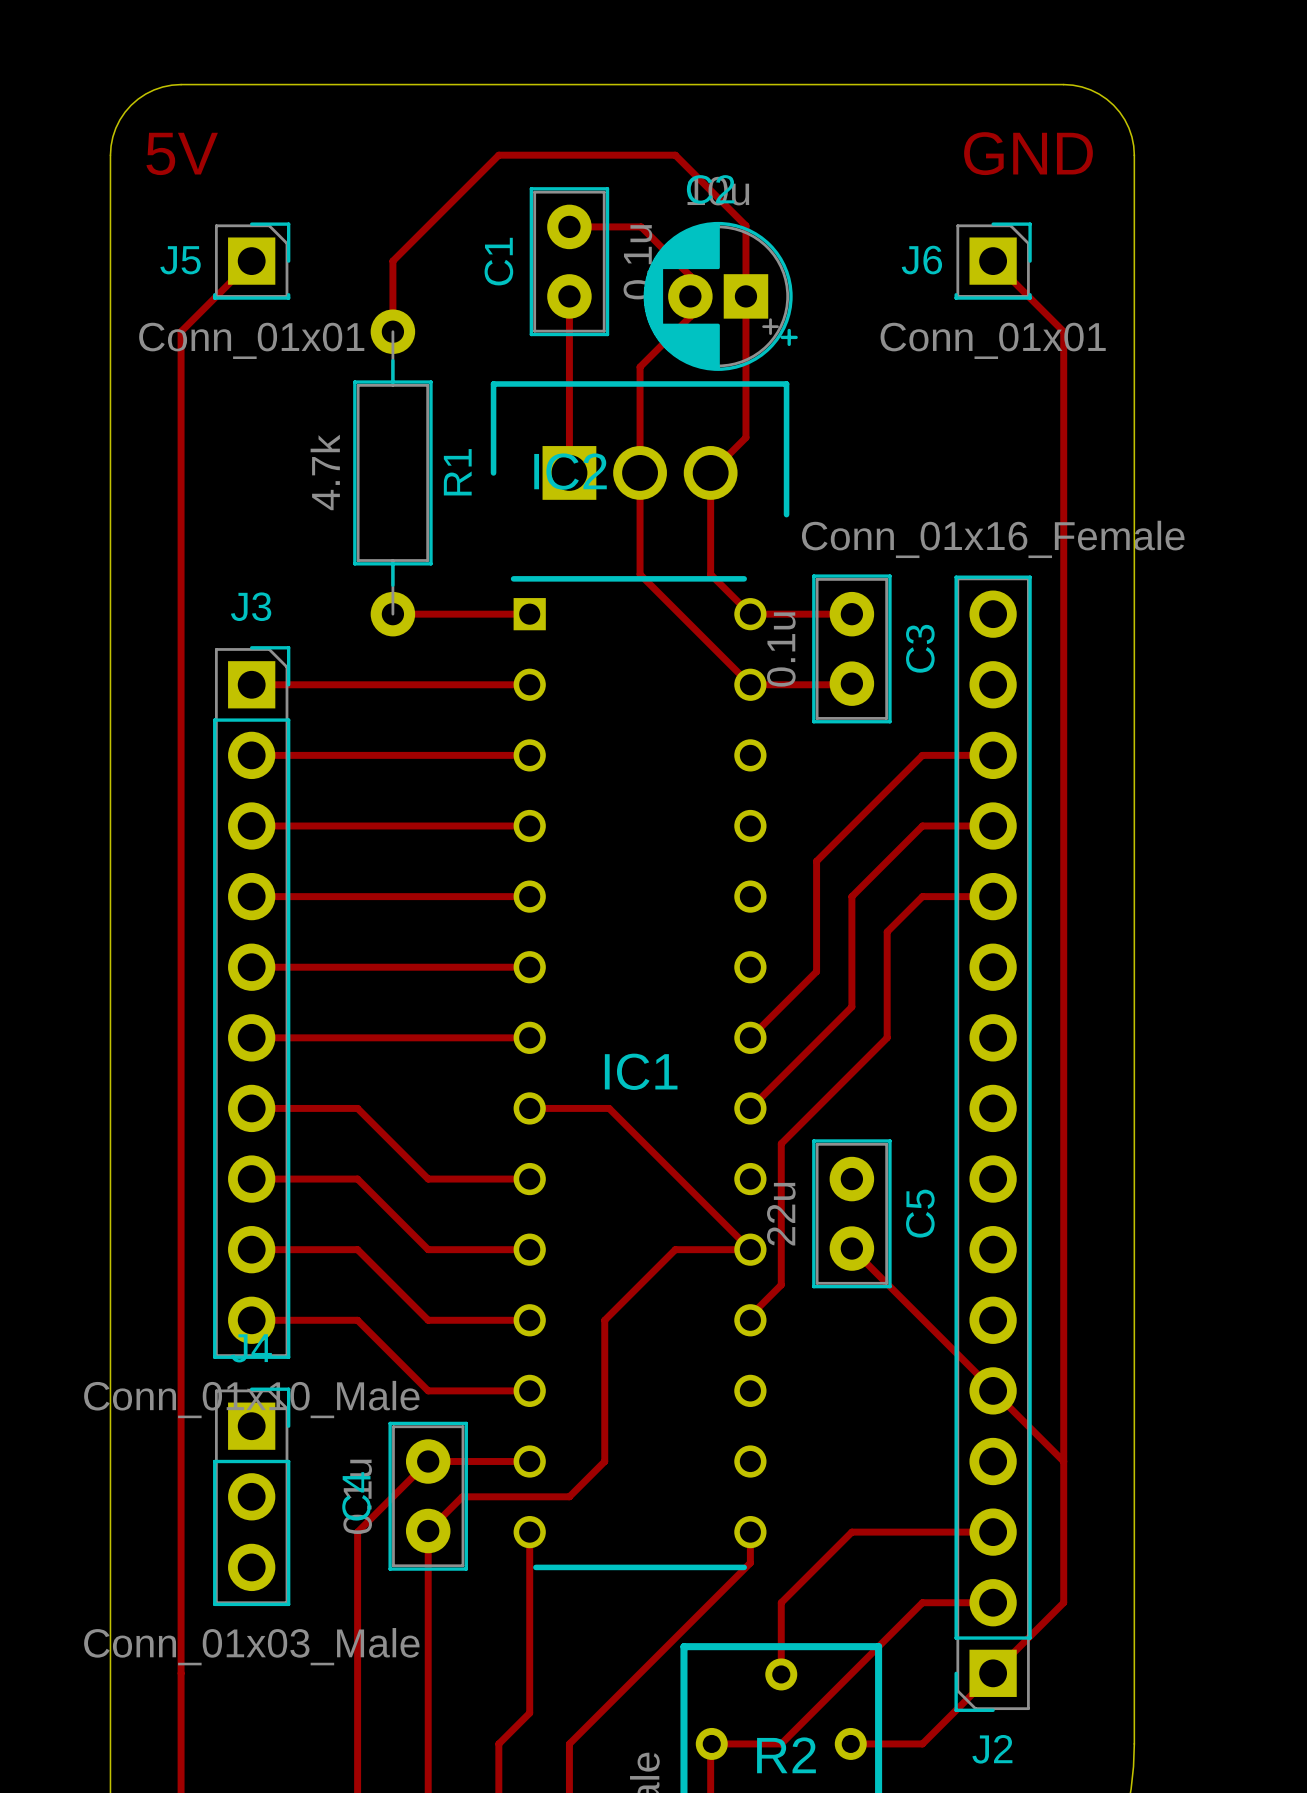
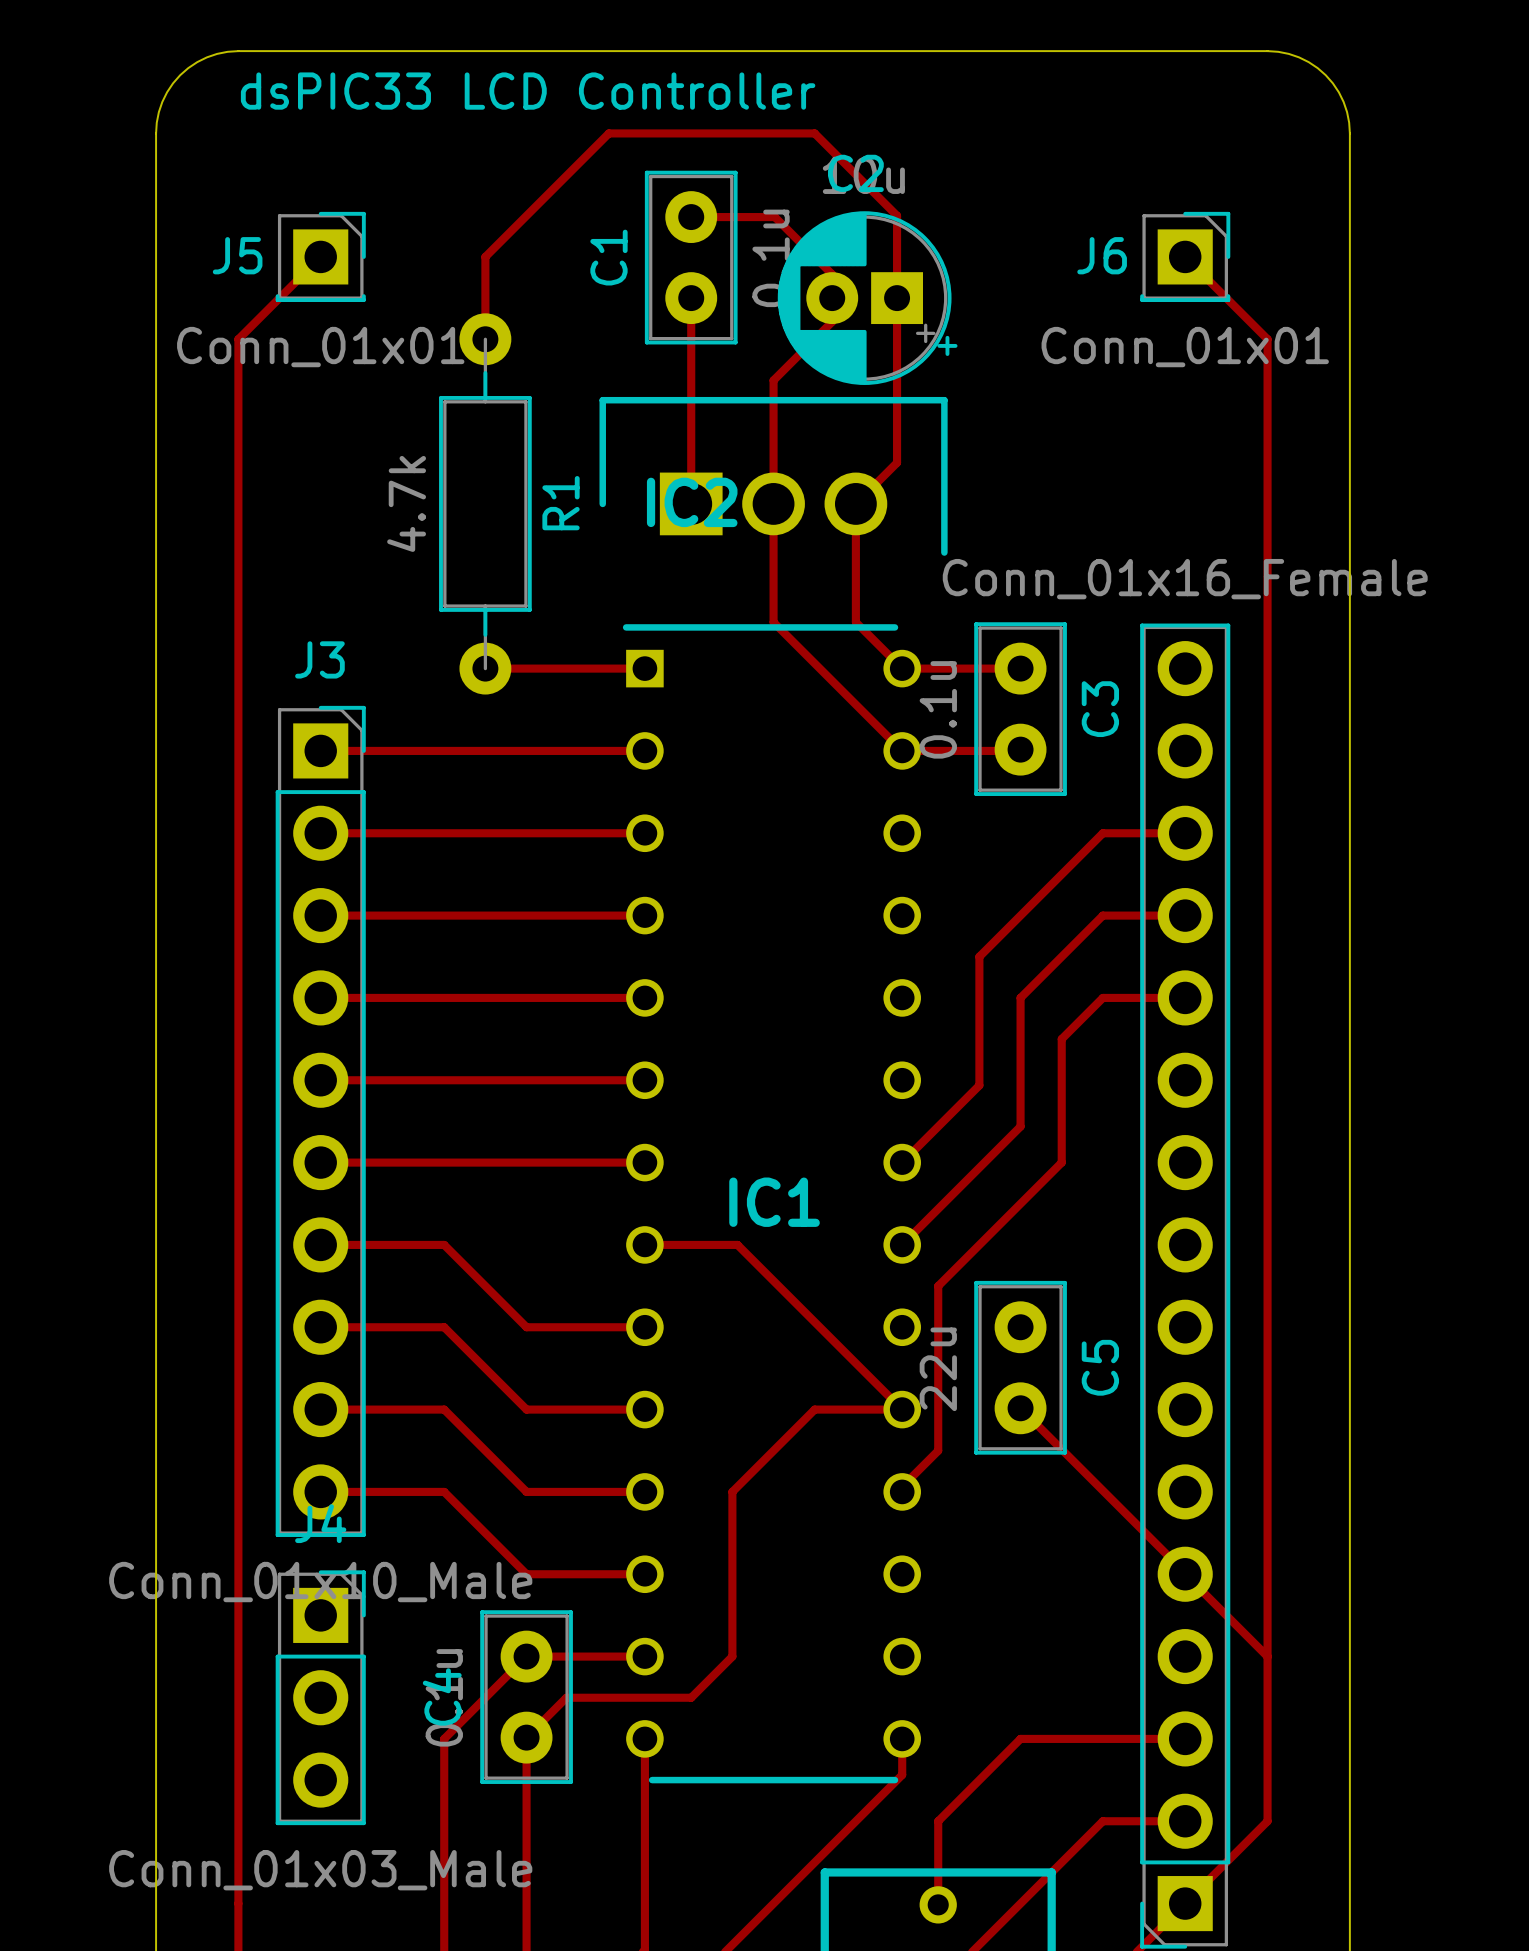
text: none -> dsPIC33 LCD Controller (528, 91)
text: 5V (182, 153) -> none
text: GND (1028, 153) -> none

